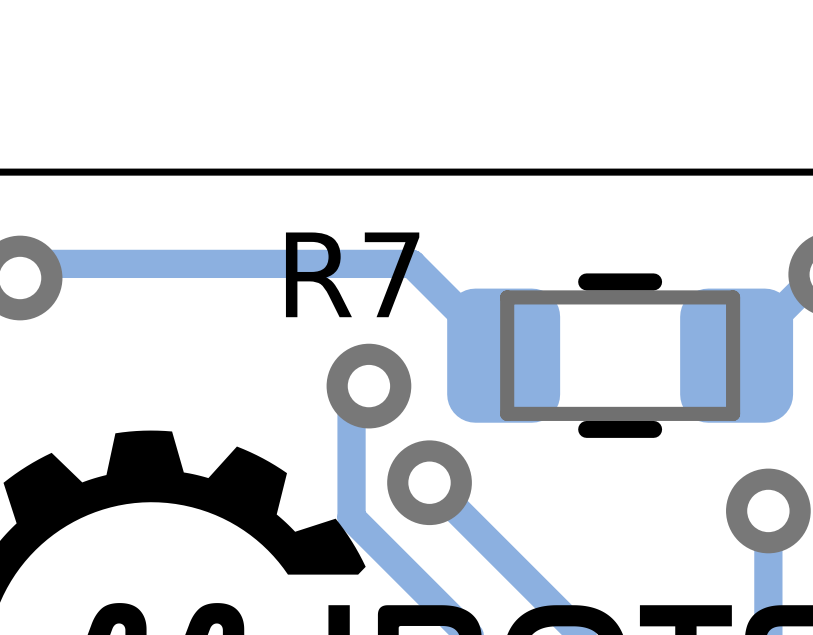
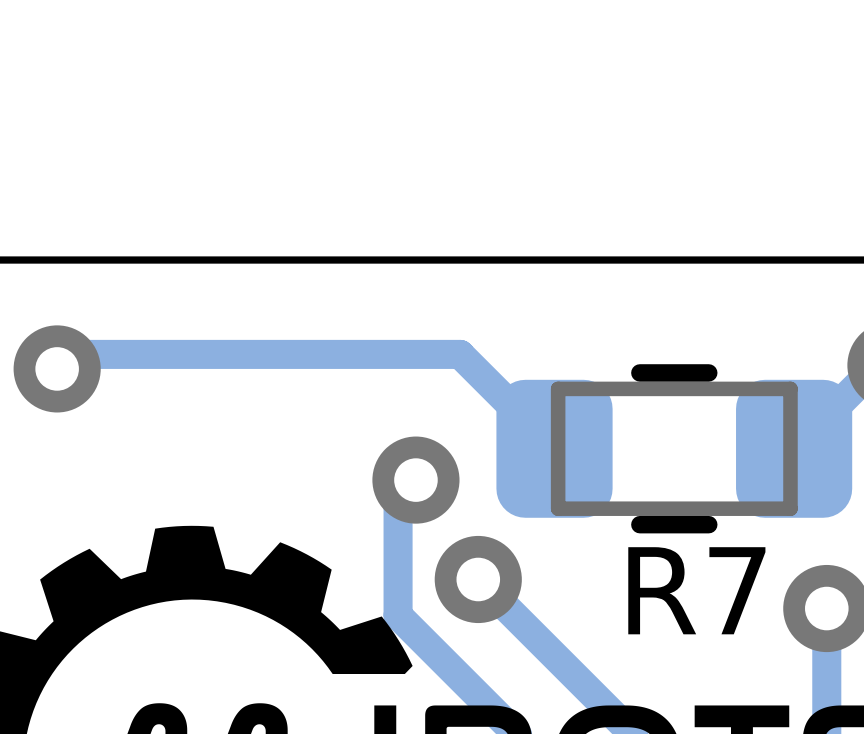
R7 name position: R7 (352, 274) -> R7 (696, 590)

